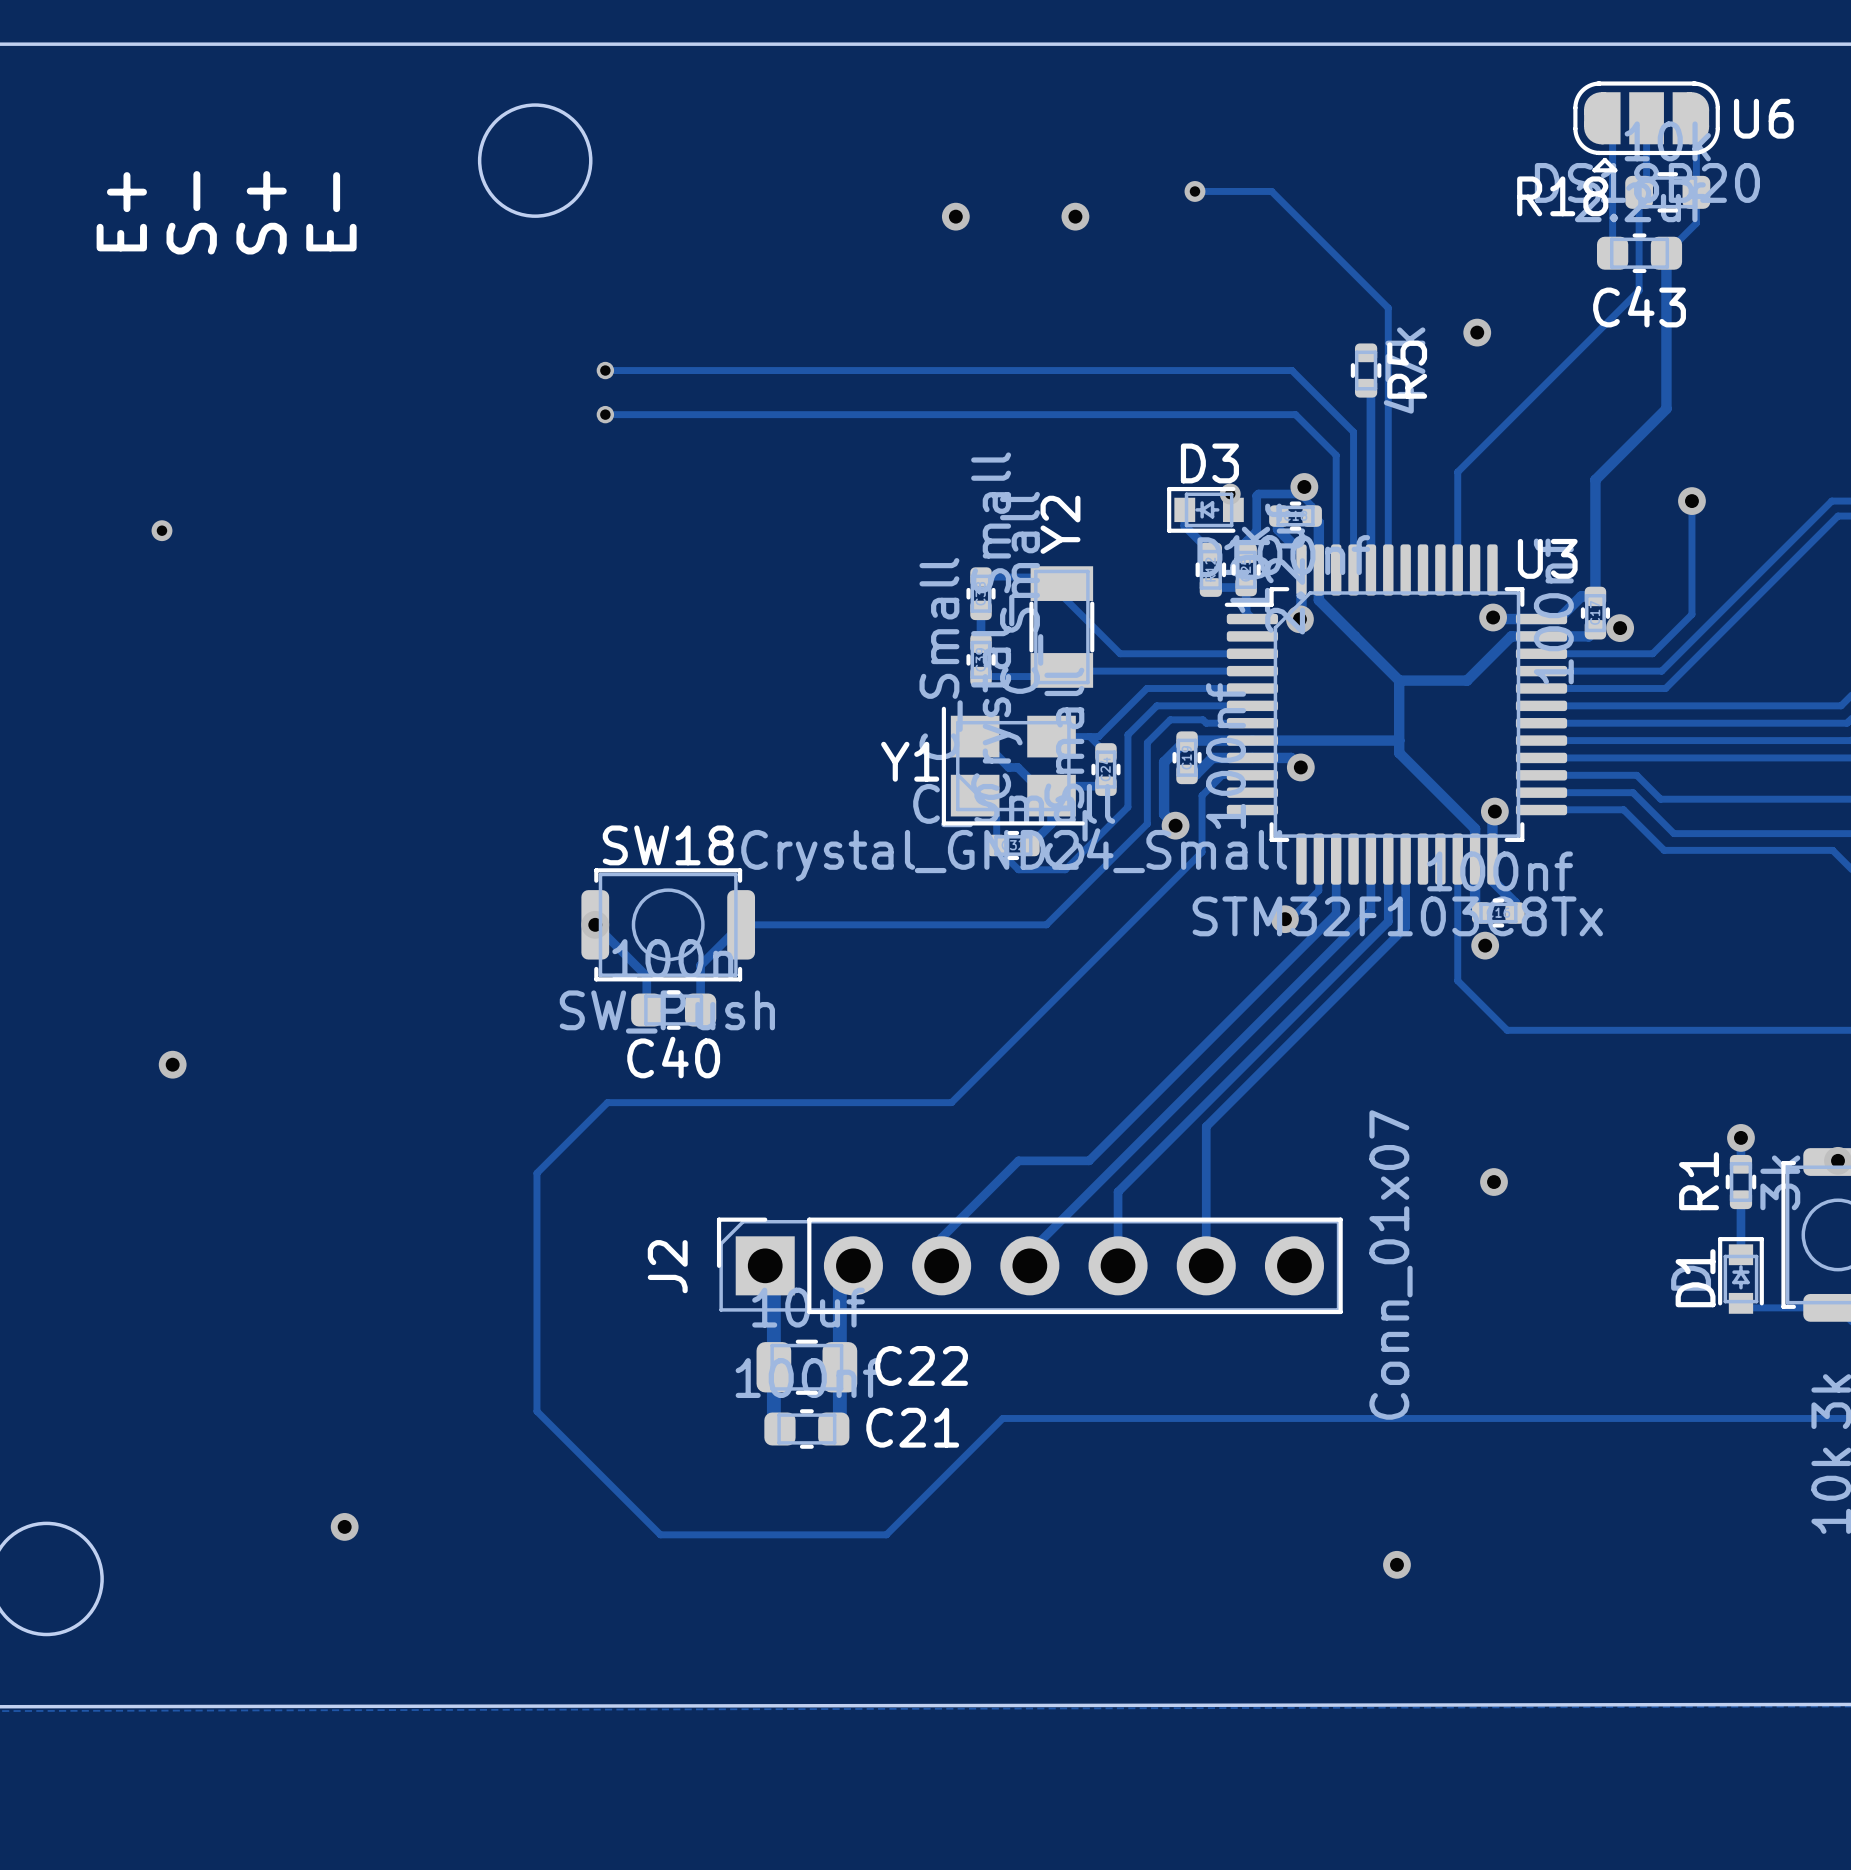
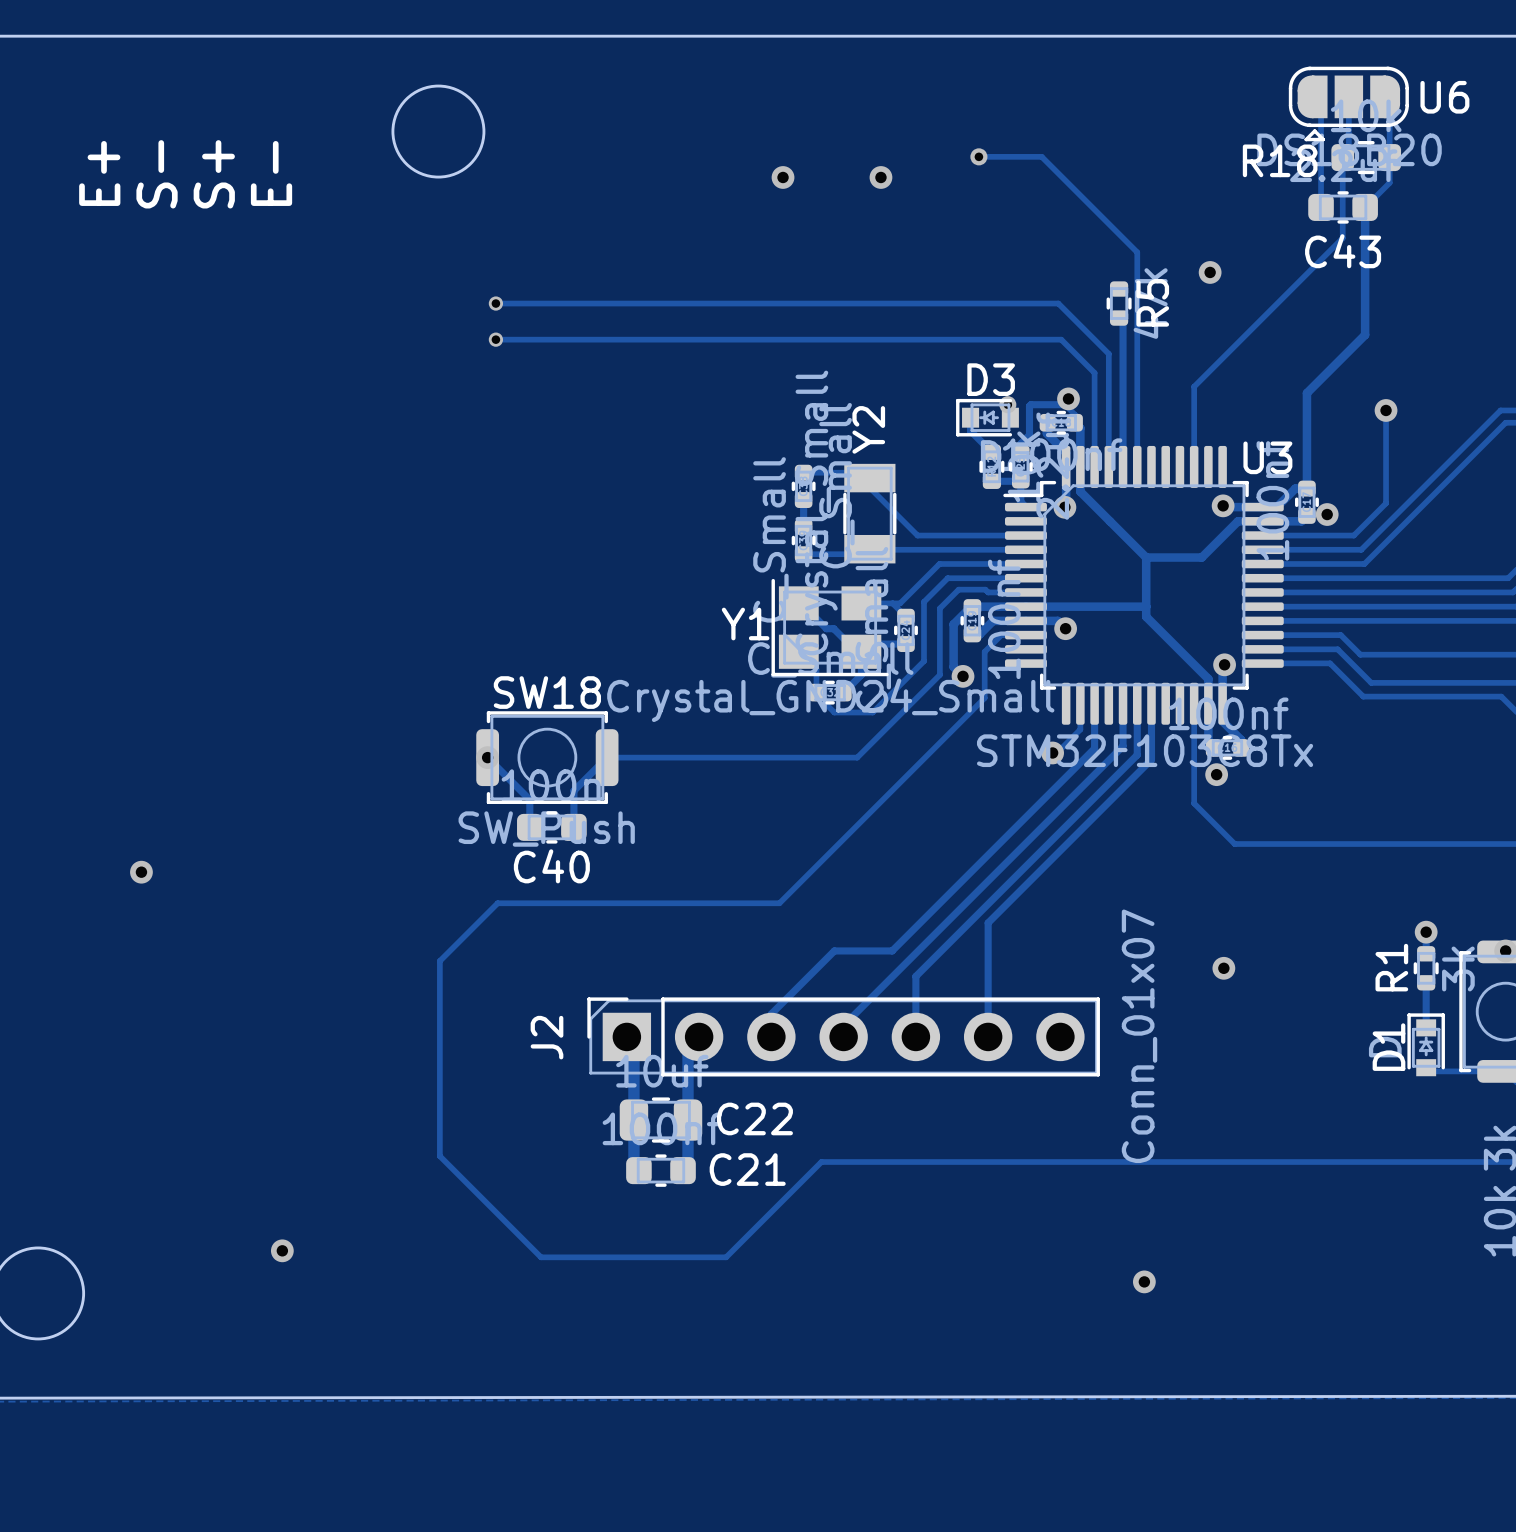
via: (161, 530) -> none

